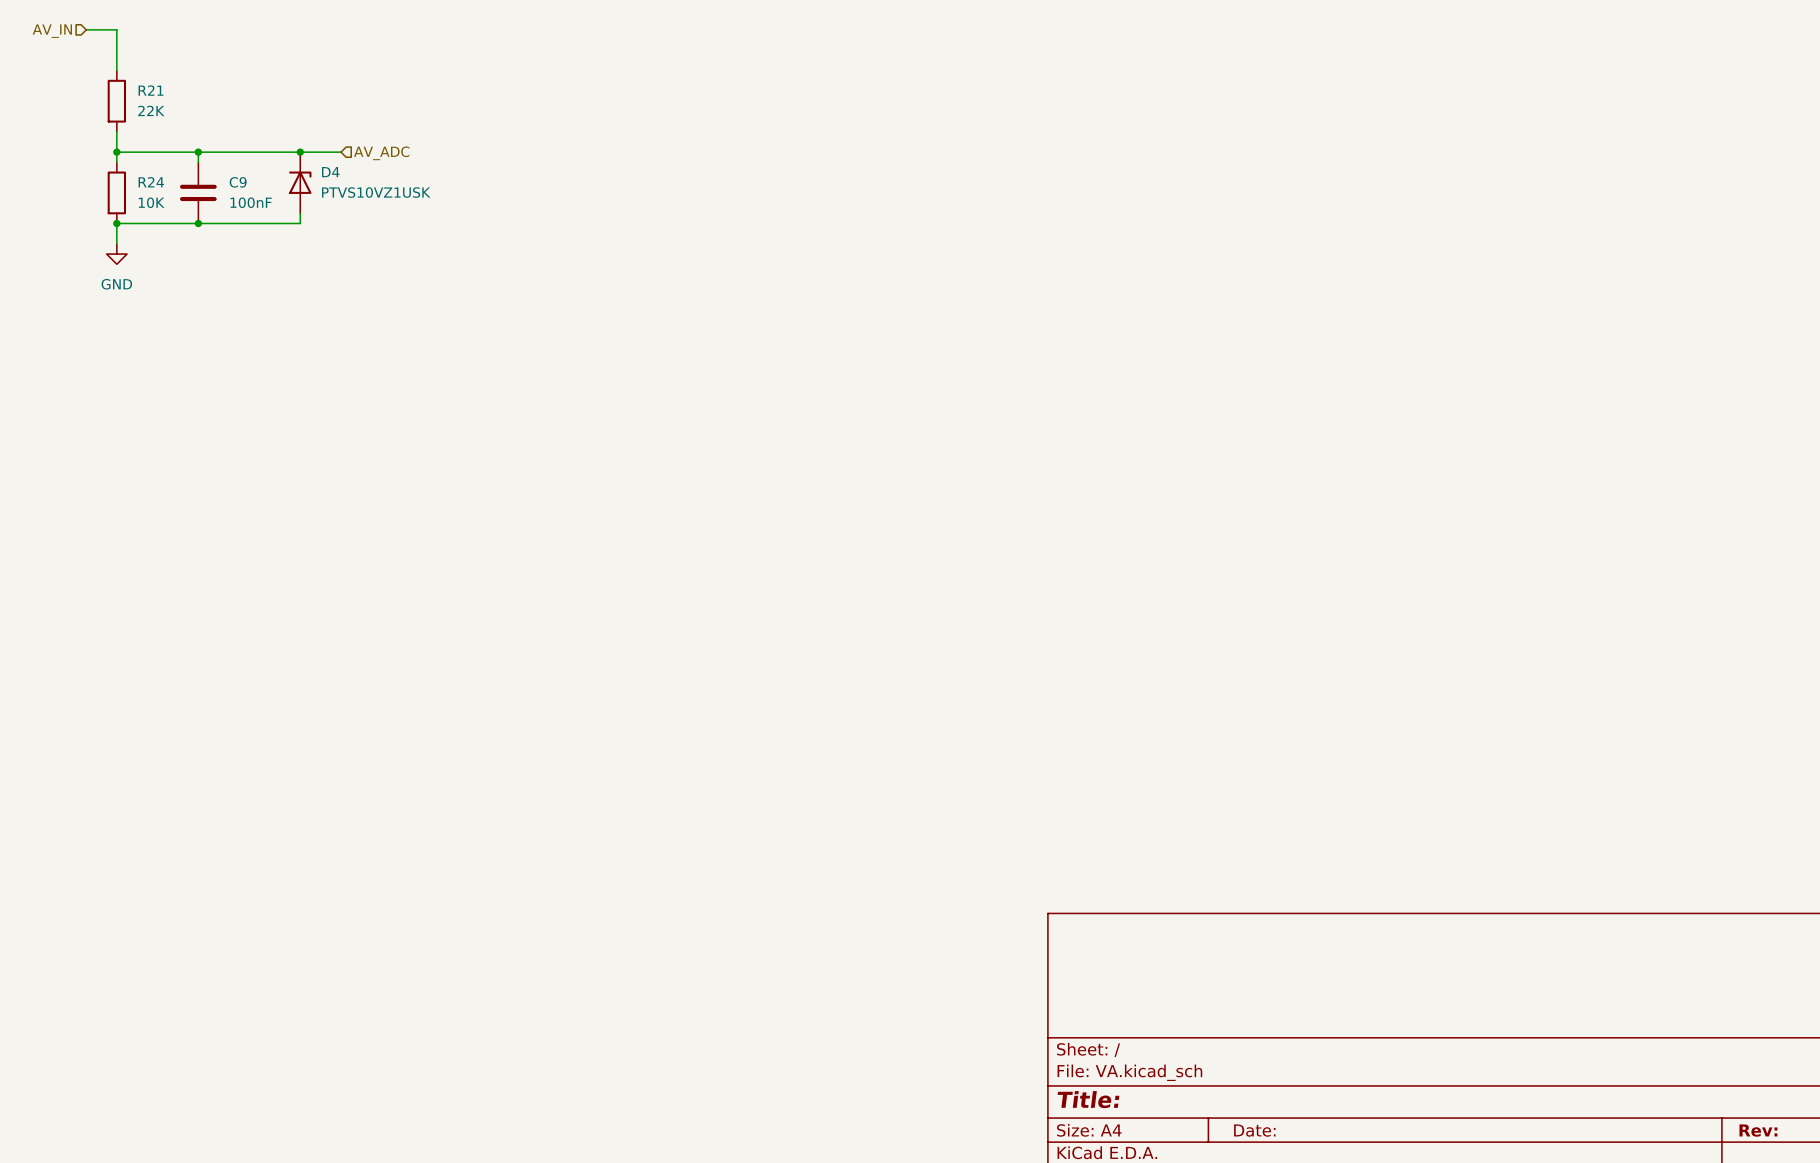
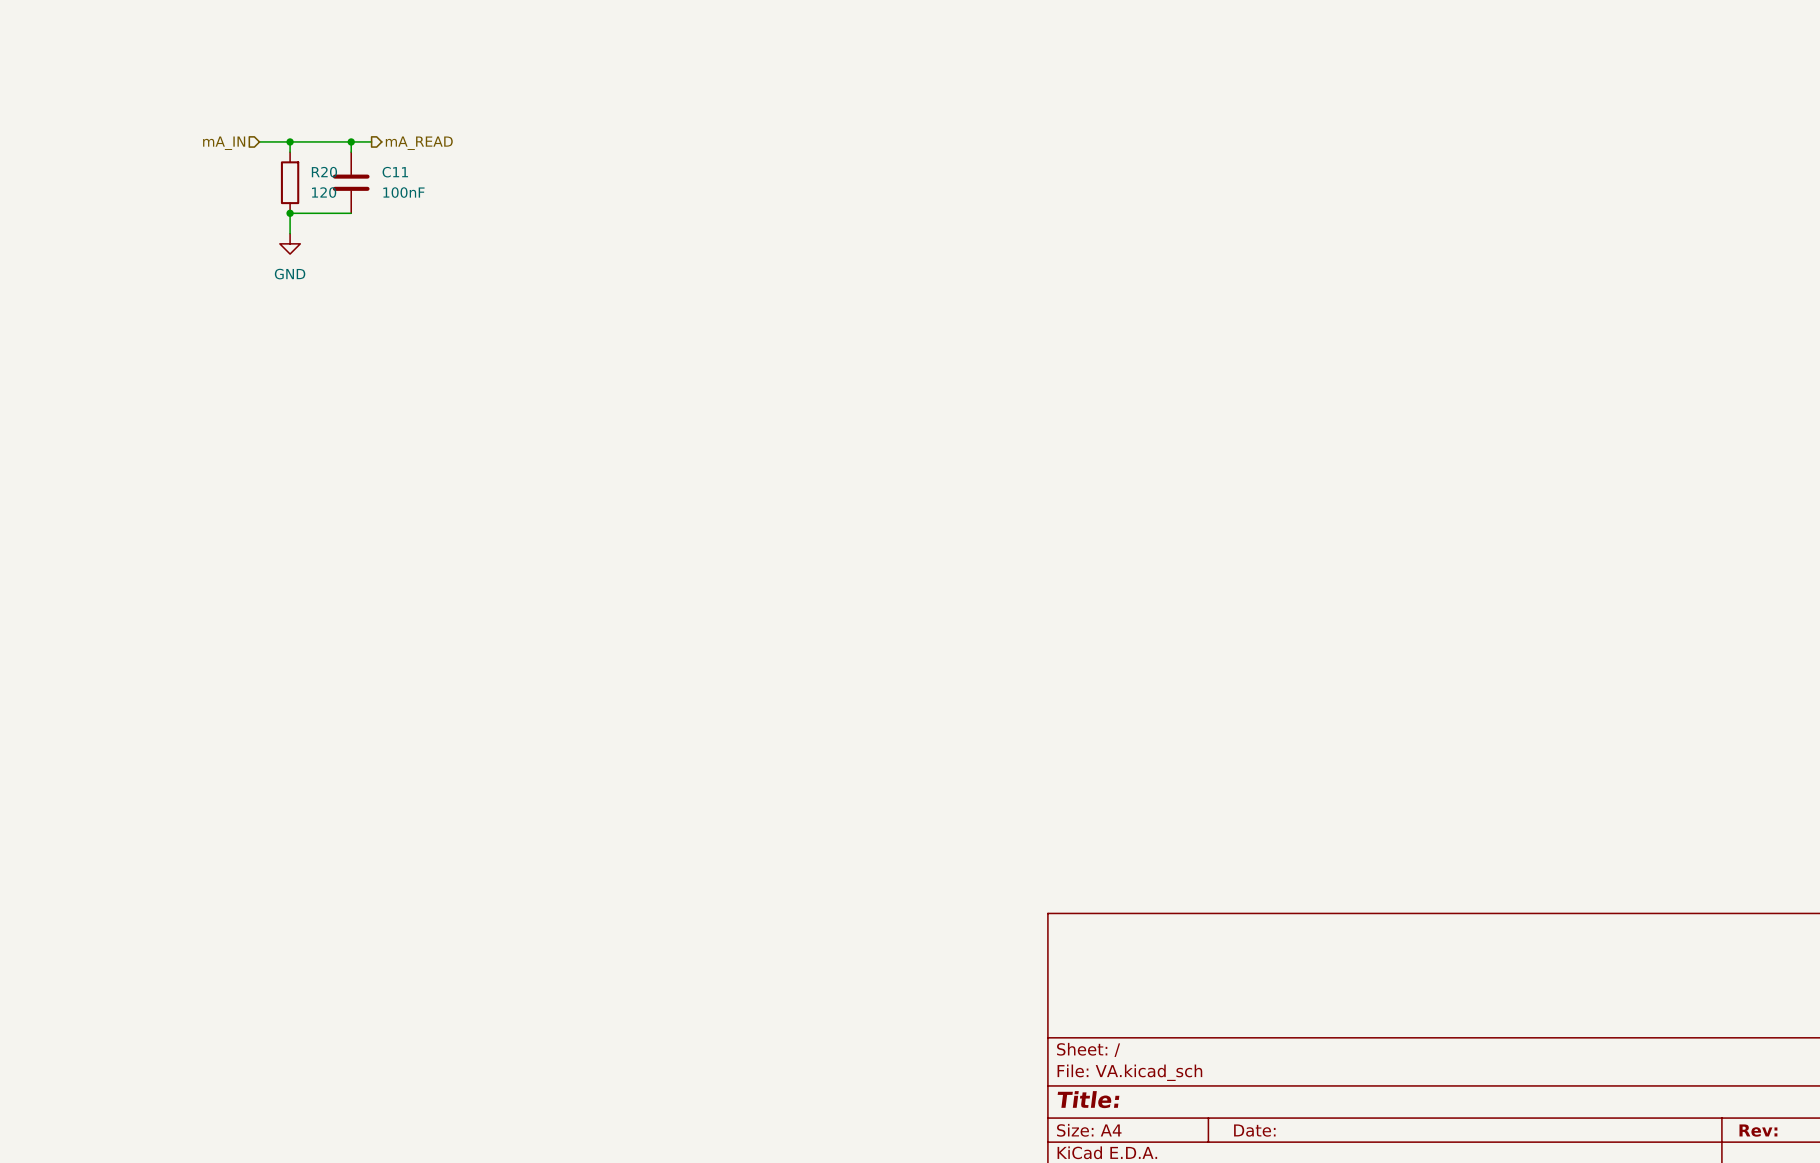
wire: (86, 29) (116, 29) (116, 70) -> none
hierarchical label: AV_IN (52, 31) -> none
R21: 22K (116, 101) -> none
wire: (116, 131) (116, 162) -> none
wire: none -> (259, 141) (371, 141)
junction: none -> (351, 141)
hierarchical label: none -> mA_IN (224, 143)
wire: (116, 152) (341, 152) -> none
junction: (116, 152) -> none
wire: (198, 152) (198, 162) -> (290, 141) (290, 152)
junction: (198, 152) -> none
junction position: (300, 152) -> (290, 141)
hierarchical label shape: input (381, 153) -> output (419, 143)
hierarchical label: AV_ADC (381, 153) -> mA_READ (419, 143)
R20: none -> 120 (290, 182)
D4: PTVS10VZ1USK (300, 182) -> none
C11: none -> 100nF (351, 182)
R24: 10K (116, 192) -> none
C9: 100nF (198, 192) -> none
junction: none -> (290, 213)
wire: (300, 213) (300, 223) (116, 223) (116, 243) -> none
wire: none -> (351, 213) (290, 213) (290, 233)
junction: (116, 223) -> none
junction: (198, 223) -> none
power symbol position: GND (116, 254) -> GND (290, 243)

